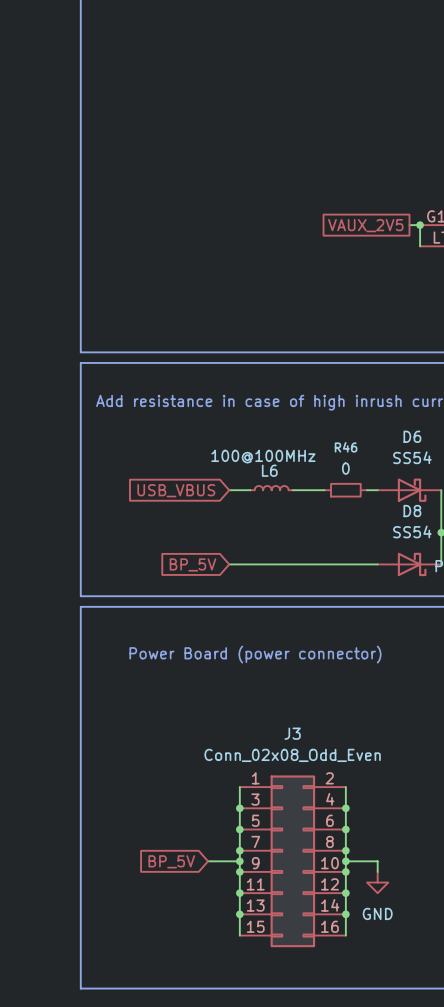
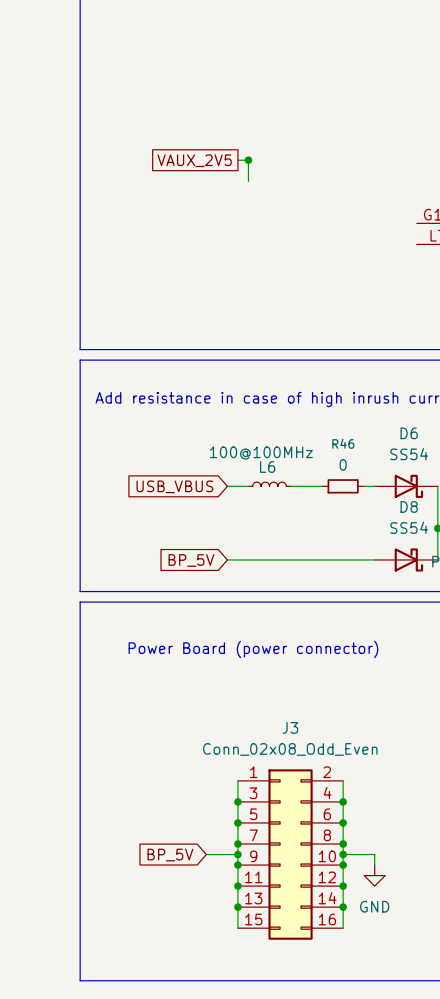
junction: none -> (248, 160)
global label position: VAUX_2V5 (365, 225) -> VAUX_2V5 (194, 160)
wire: (409, 225) (420, 225) (420, 246) -> (237, 160) (248, 160) (248, 181)
junction: (420, 225) -> none

